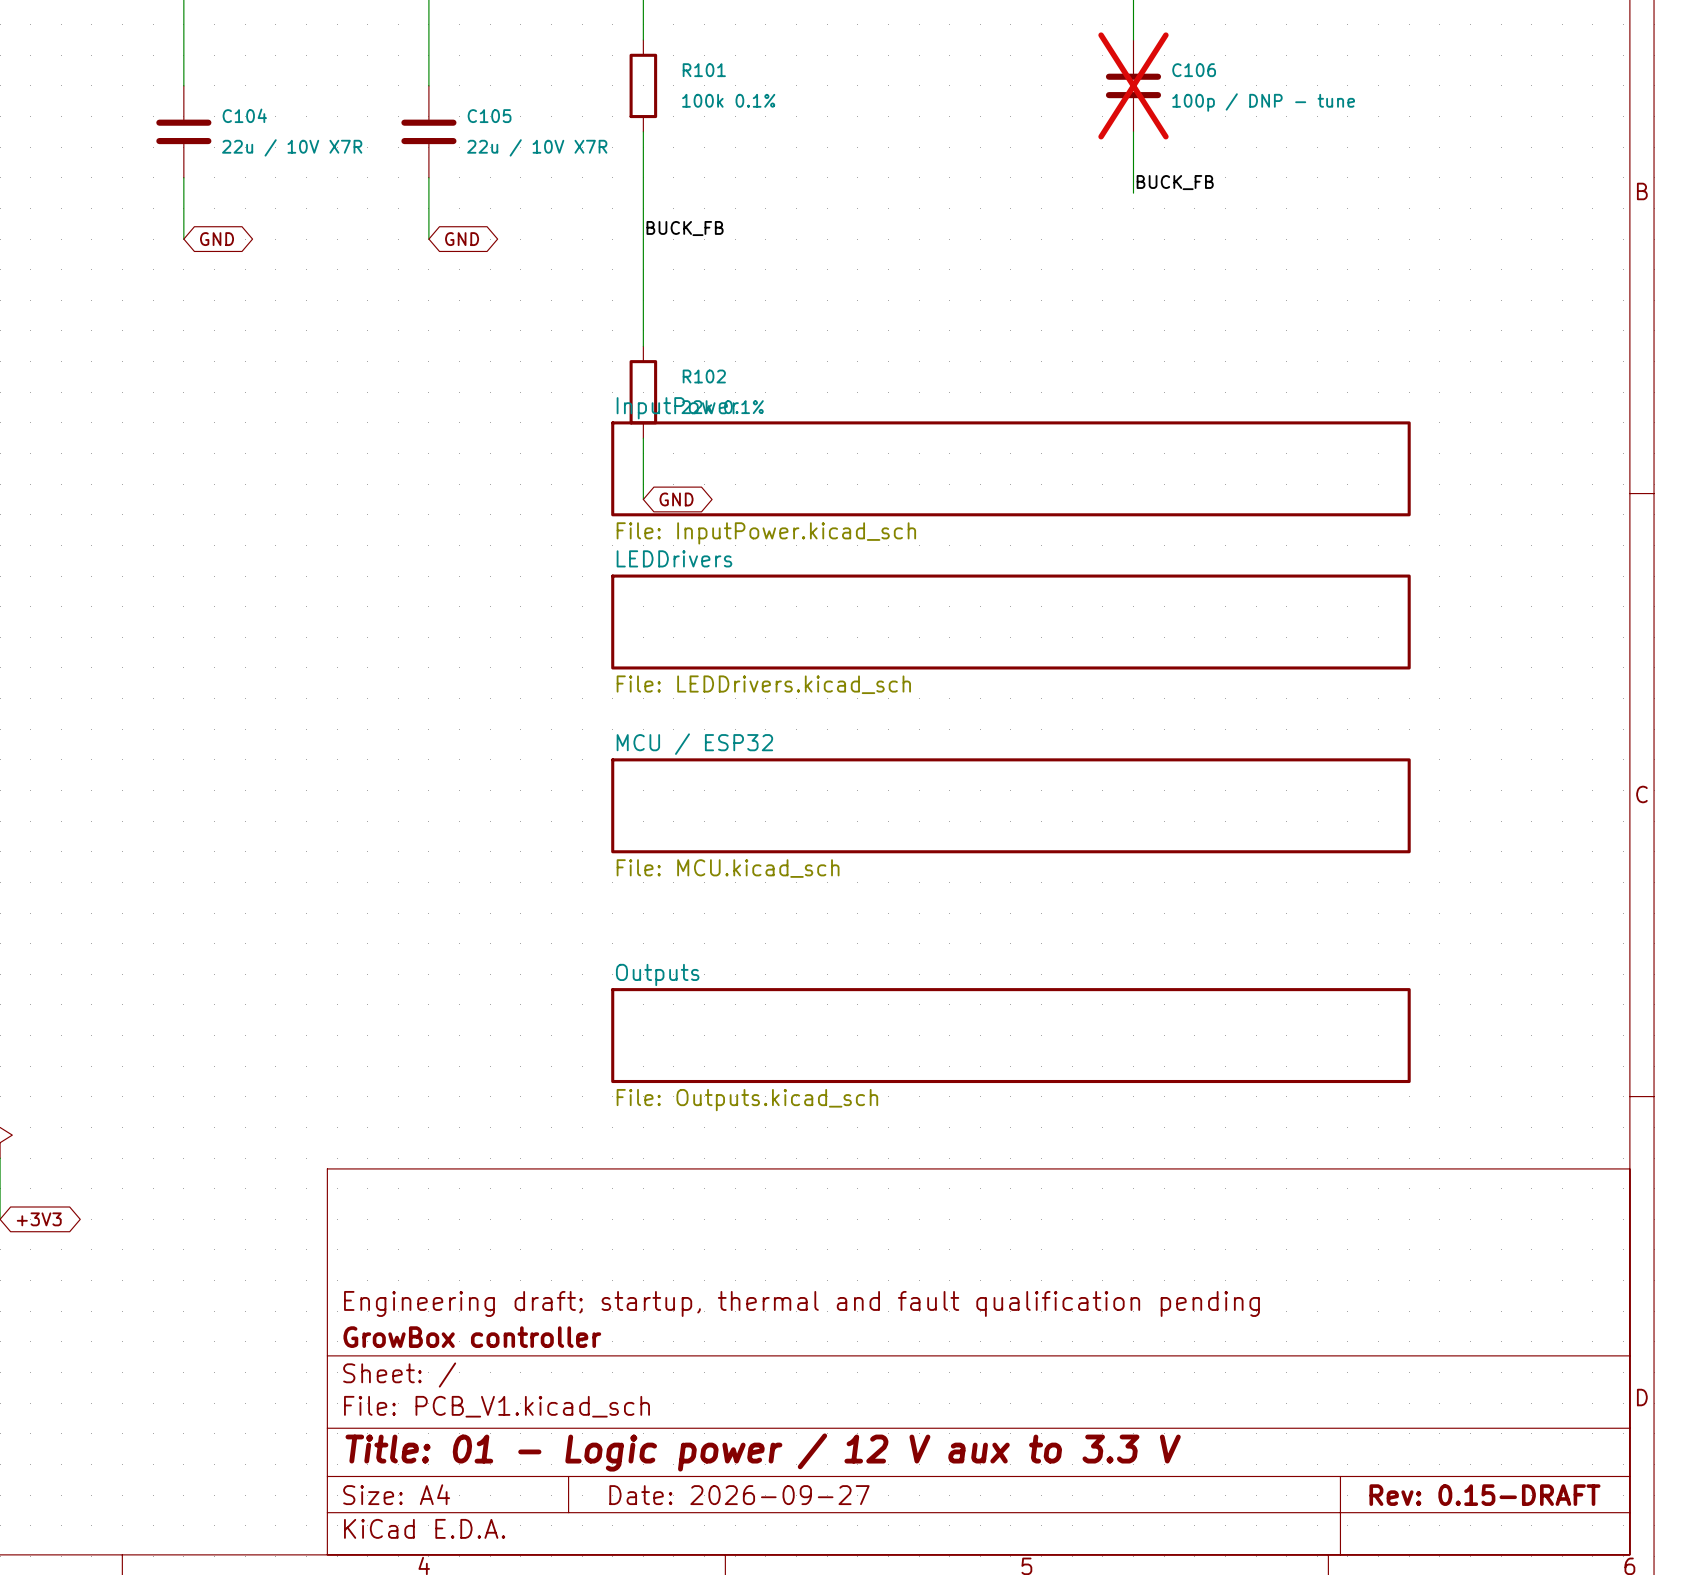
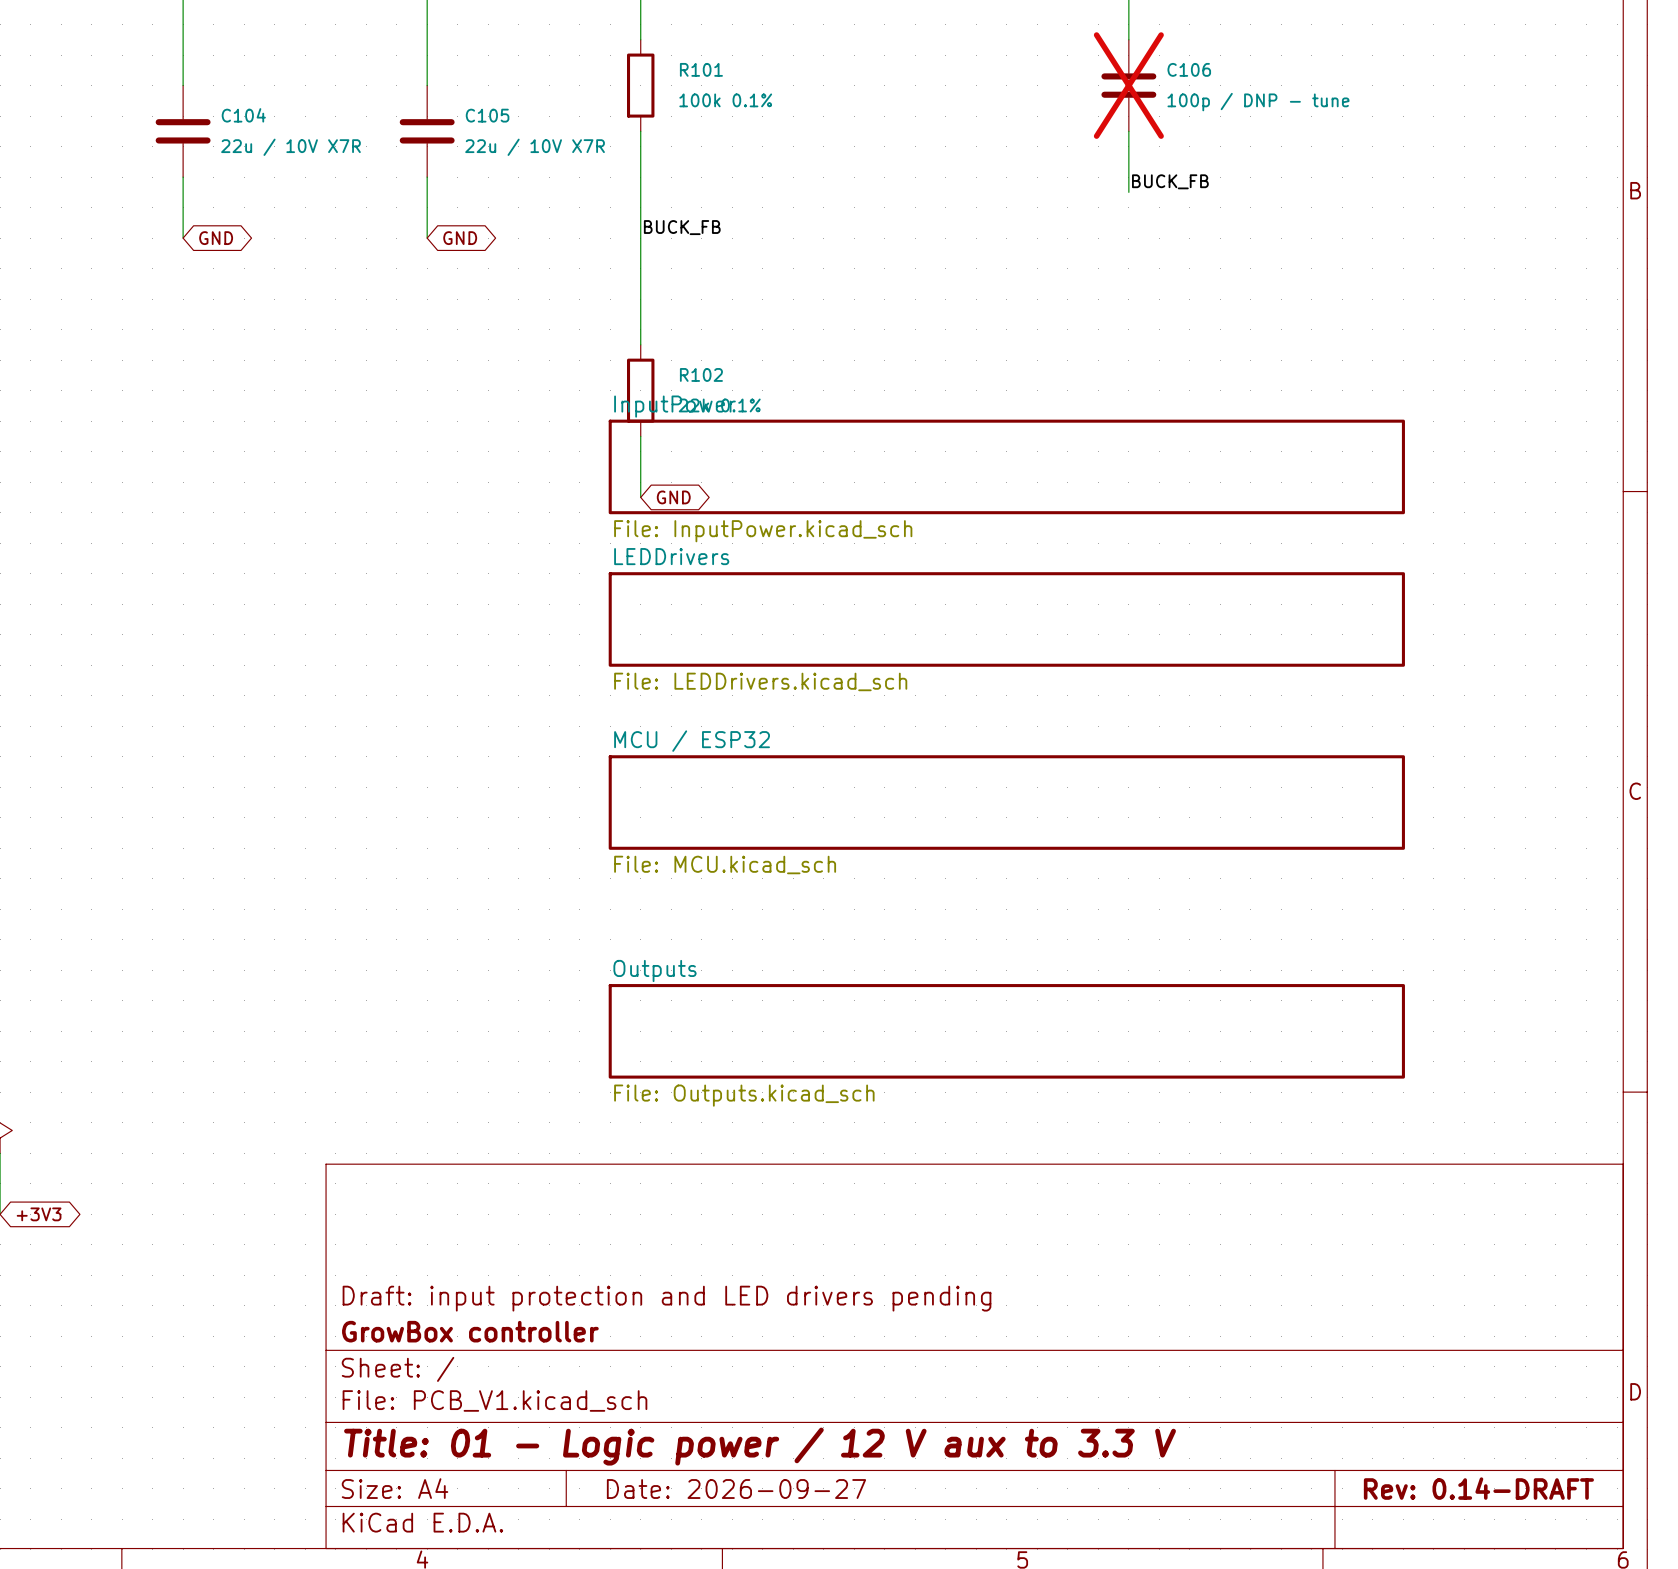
title block: Engineering draft; startup, thermal and fault qualification pending (801, 1303) -> Draft: input protection and LED drivers pending (666, 1298)
title block: Rev: 0.15-DRAFT (1484, 1495) -> Rev: 0.14-DRAFT (1478, 1488)

